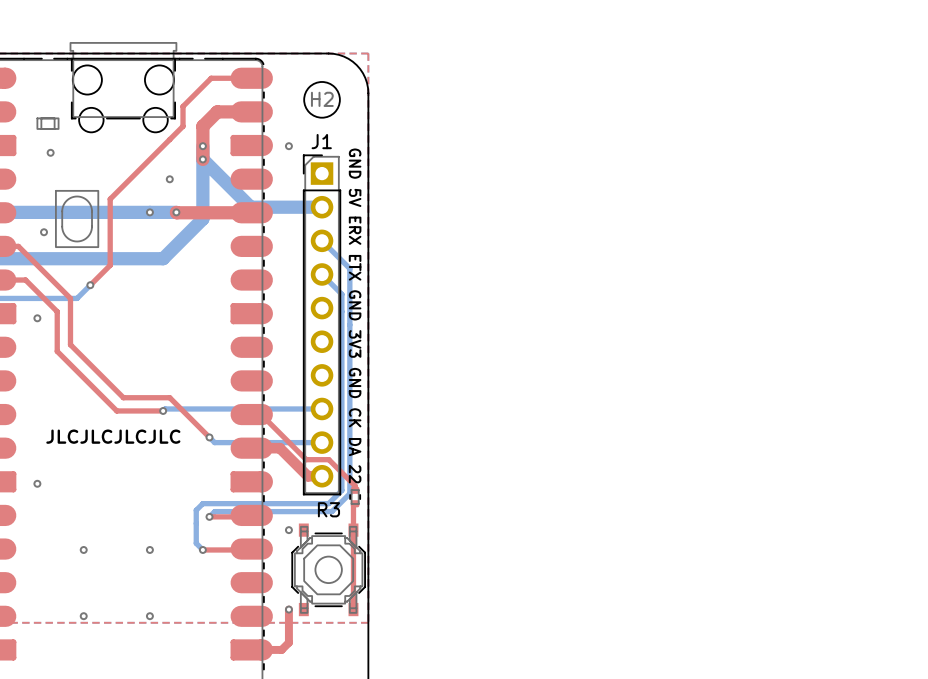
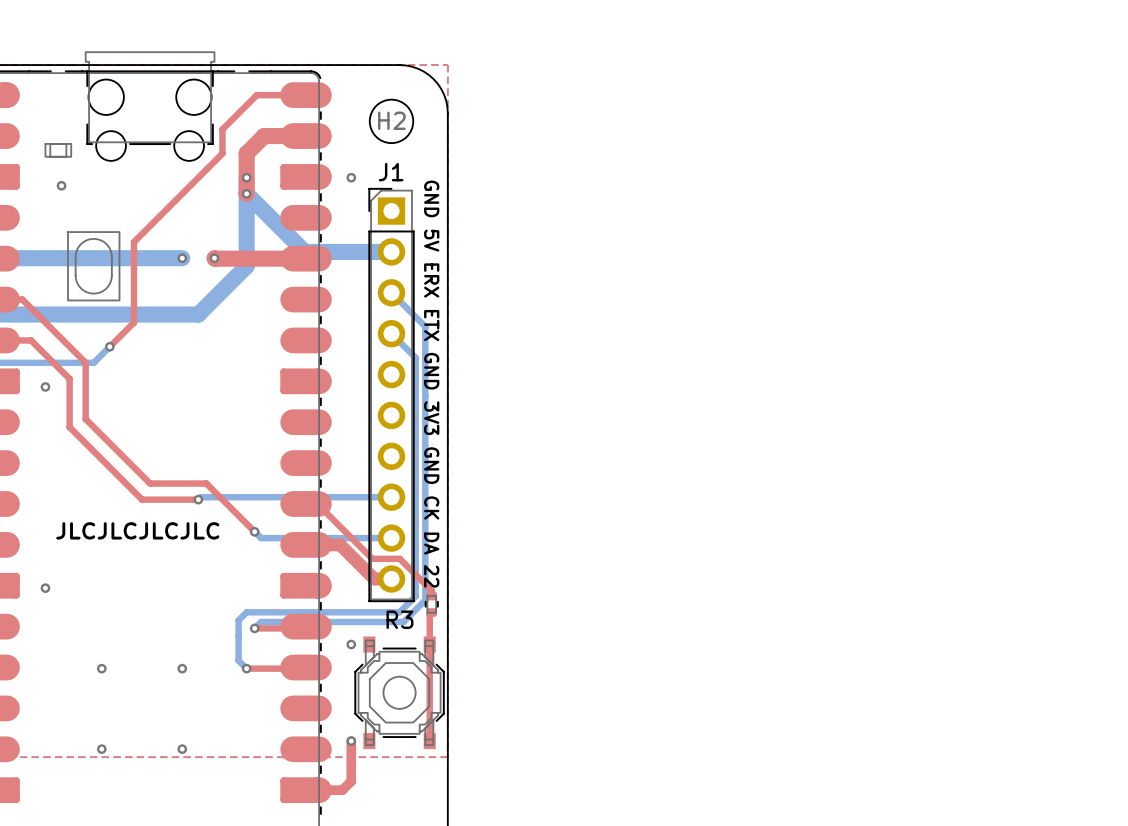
via: (169, 179) -> none
bottom track: (149, 212) (176, 212) -> none
via: (44, 232) -> none

